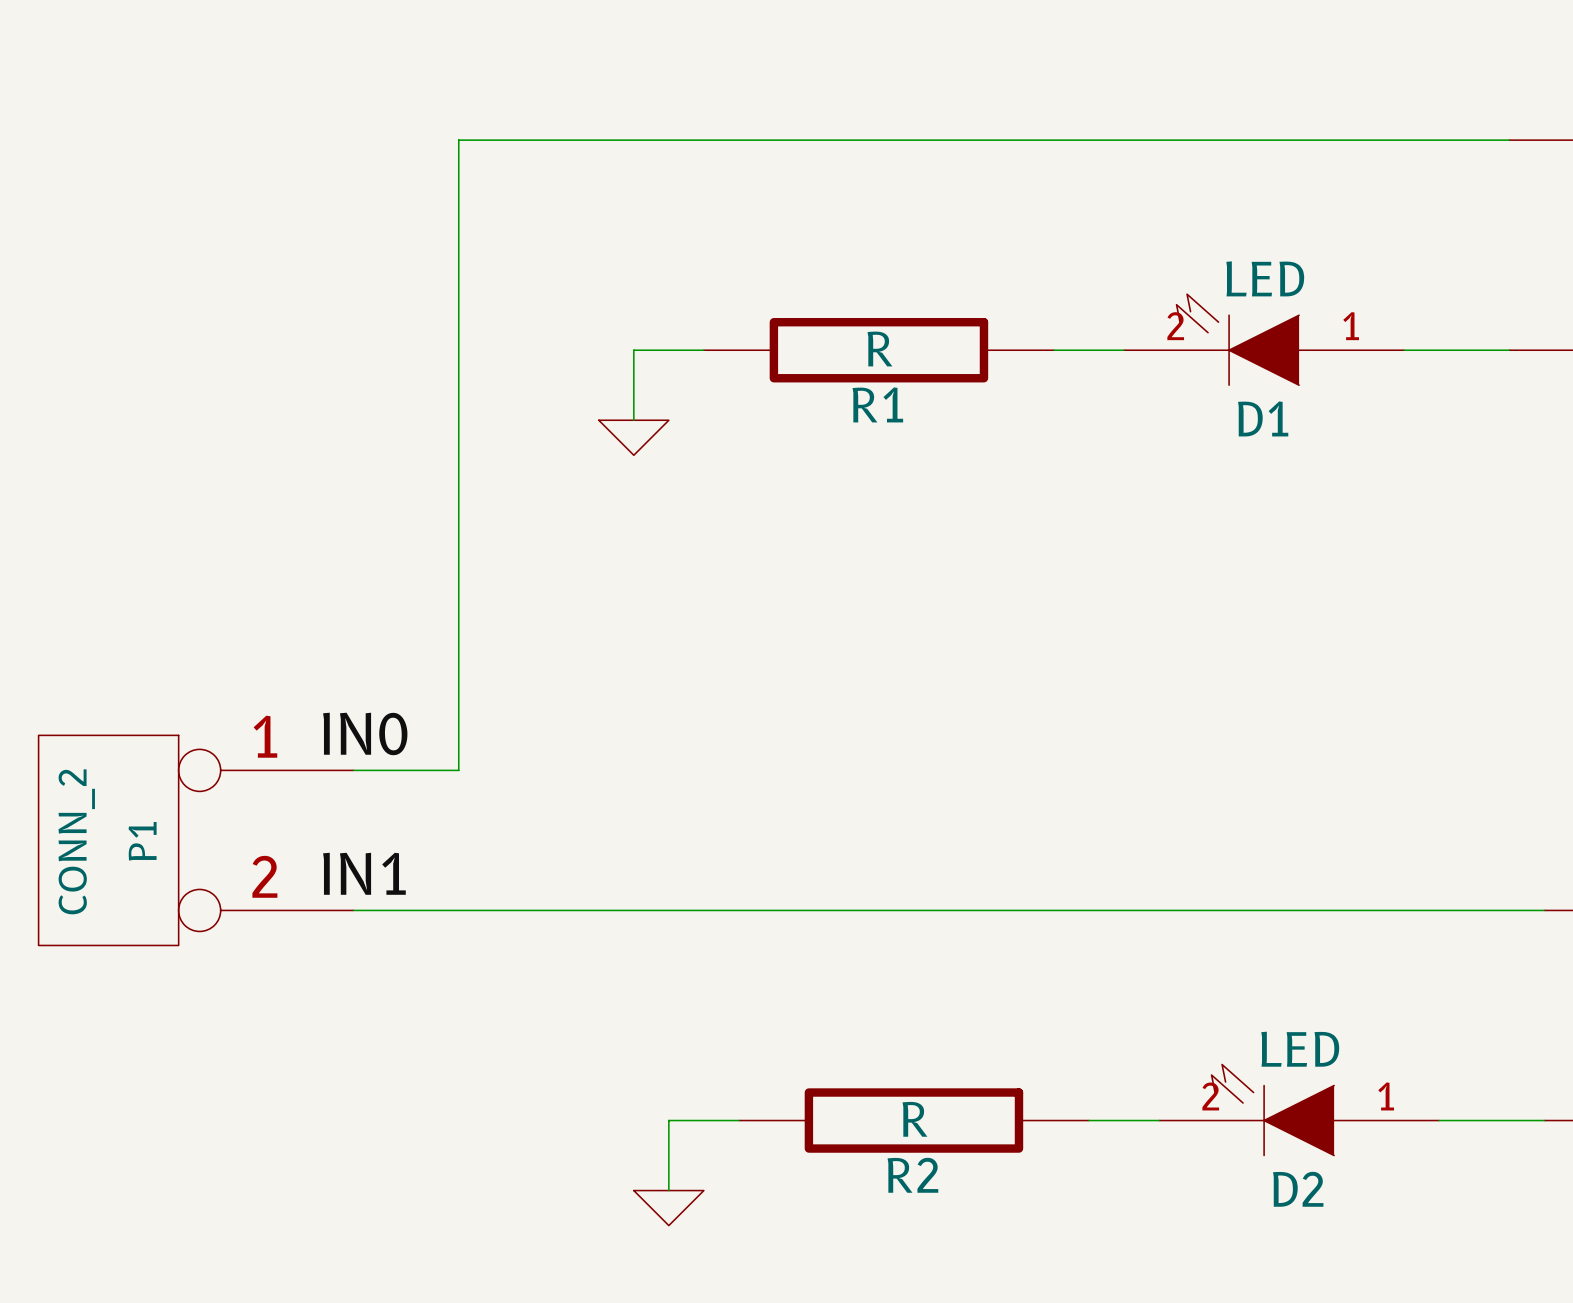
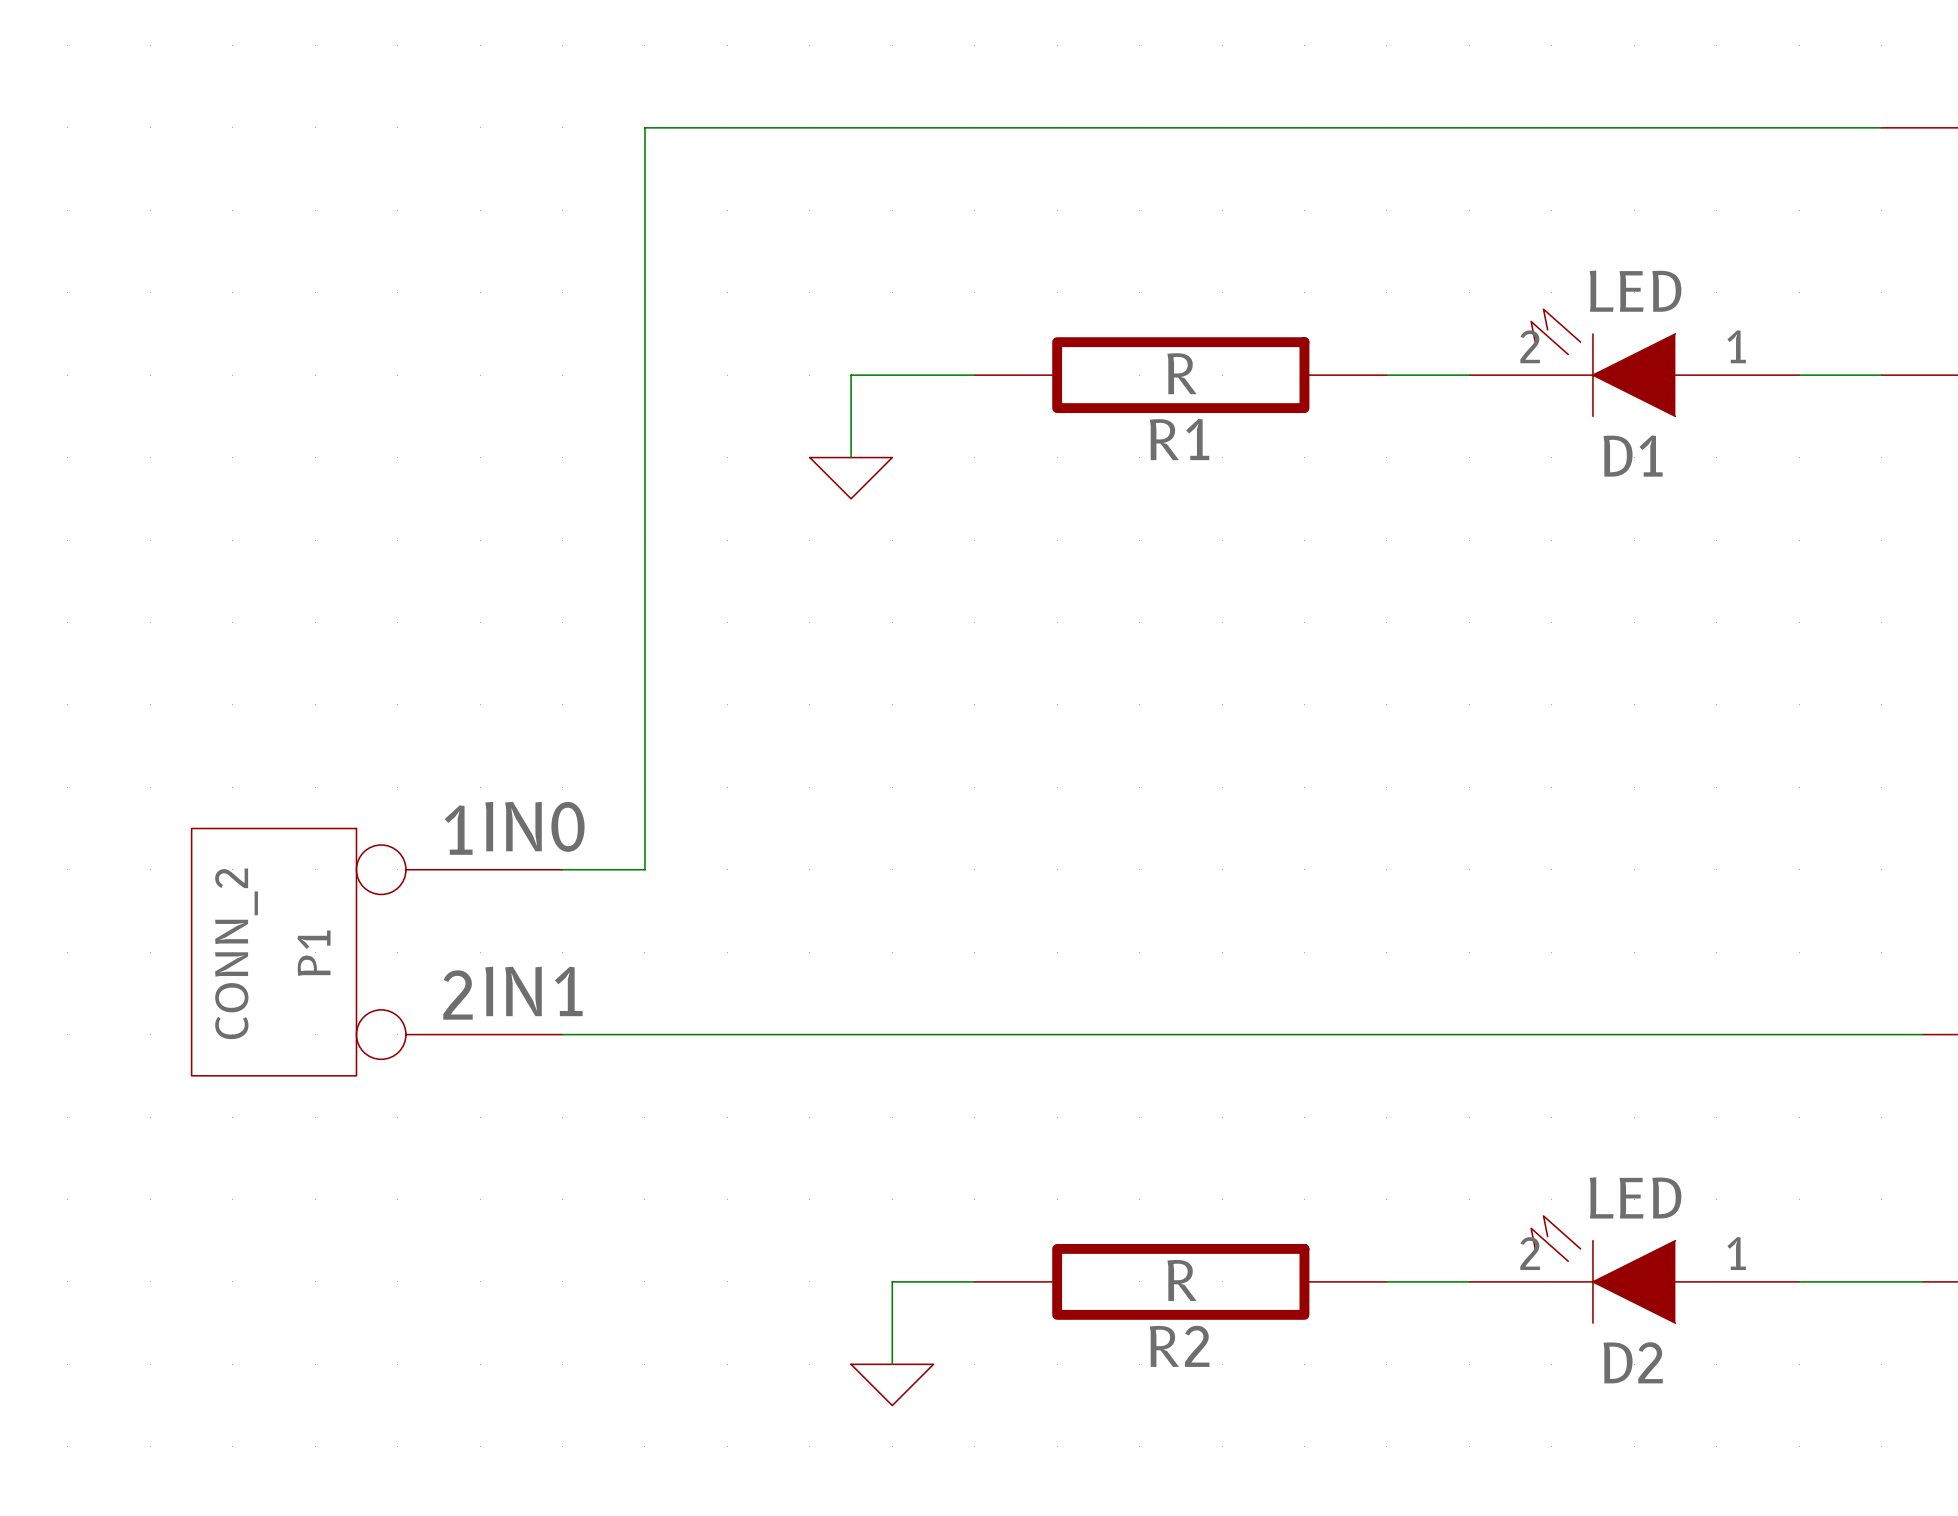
D1 position: (1264, 339) -> (1634, 362)
R1 position: (878, 350) -> (1180, 375)
P1 position: (196, 840) -> (377, 952)

